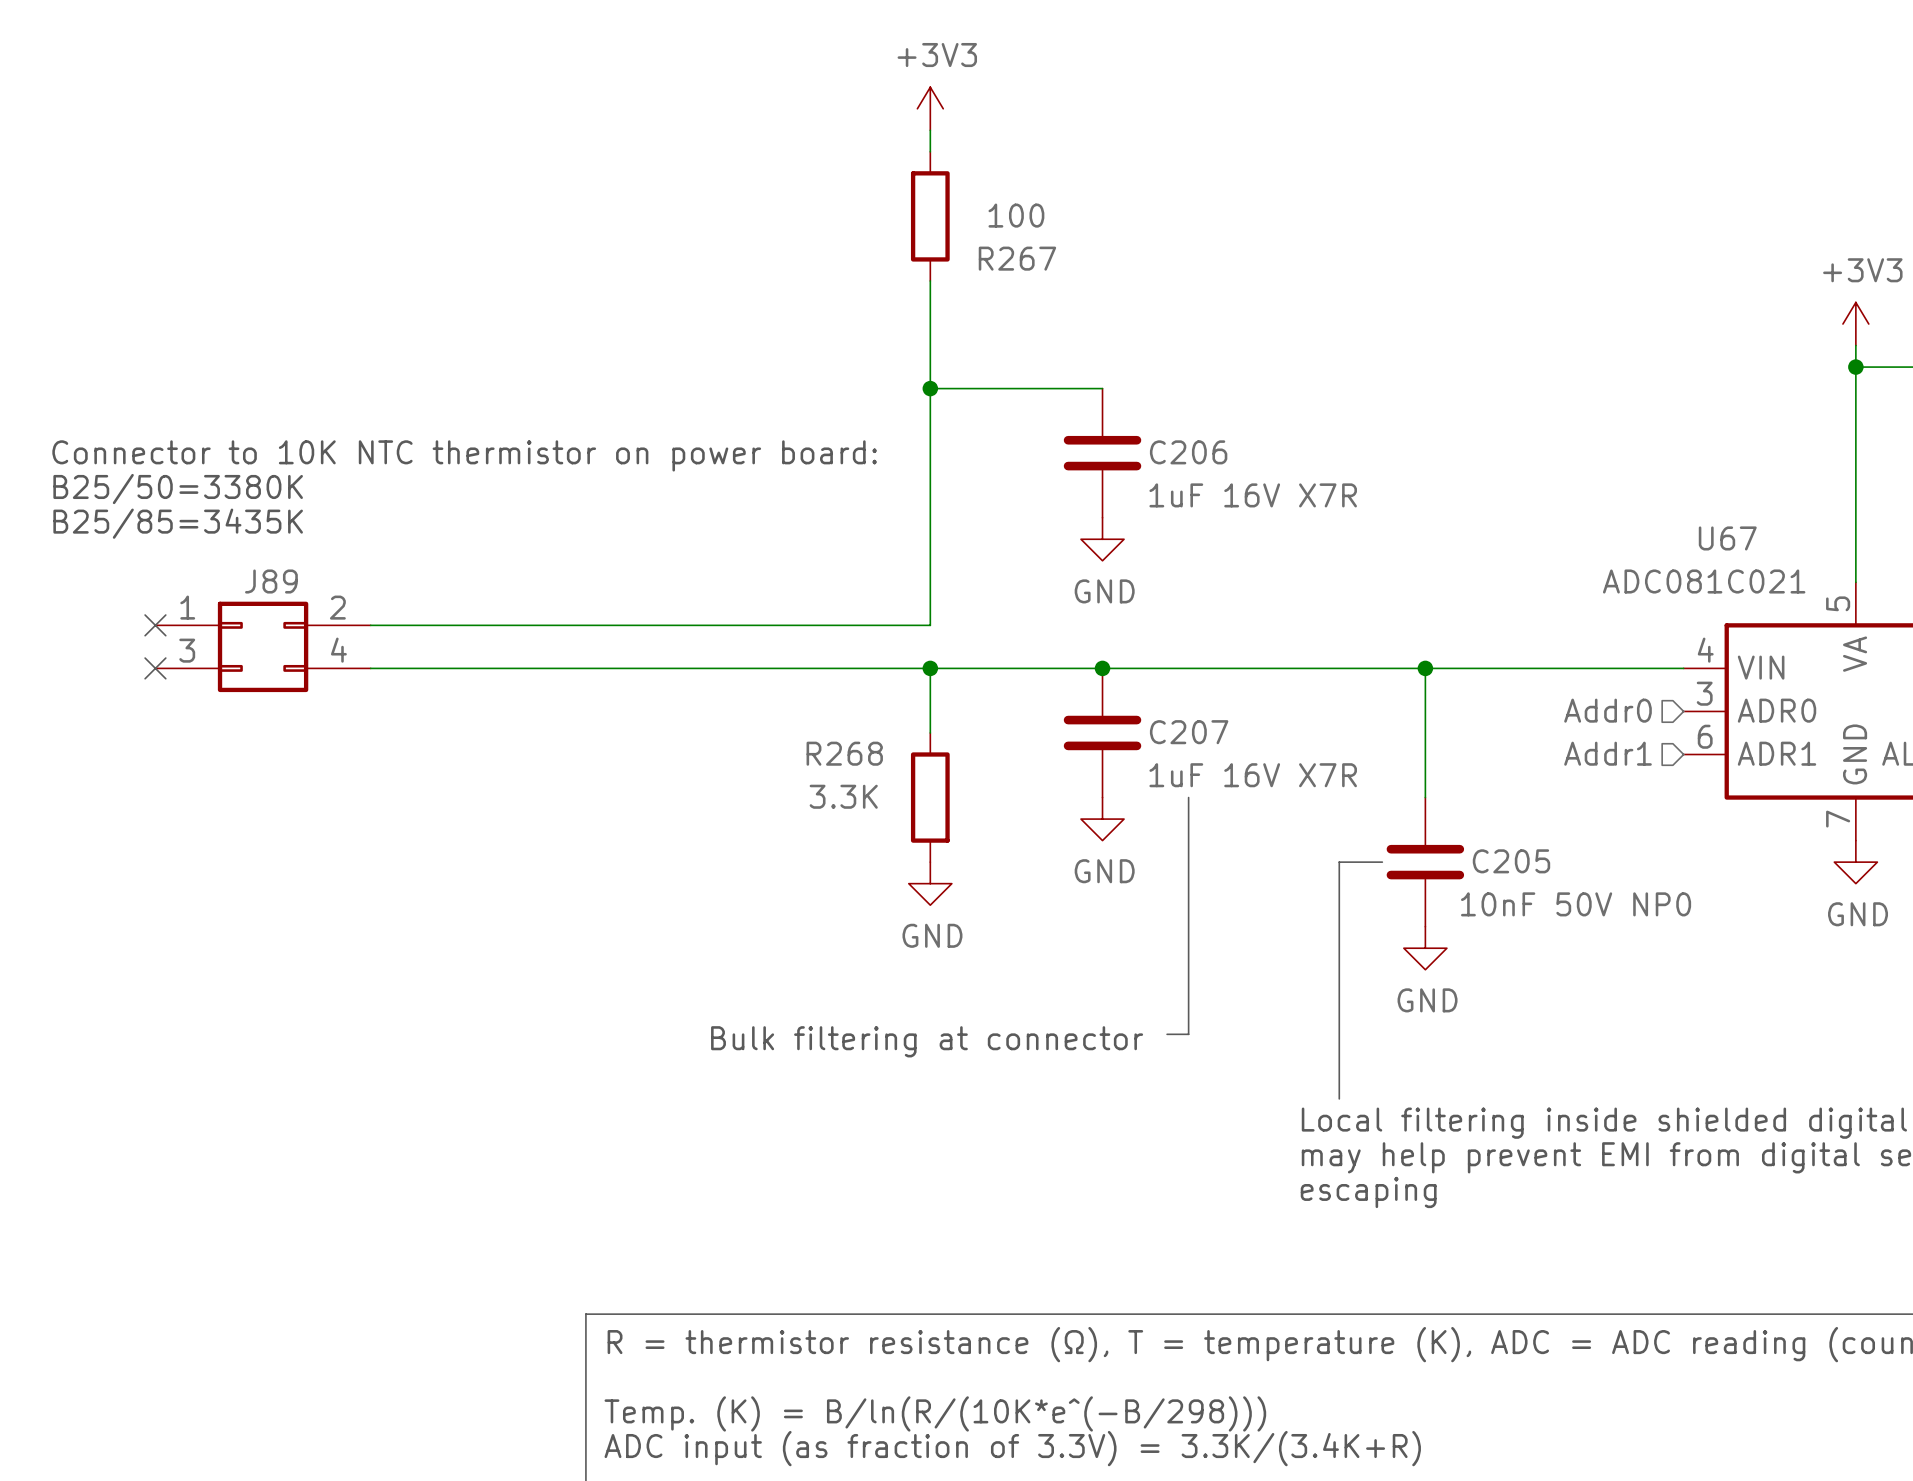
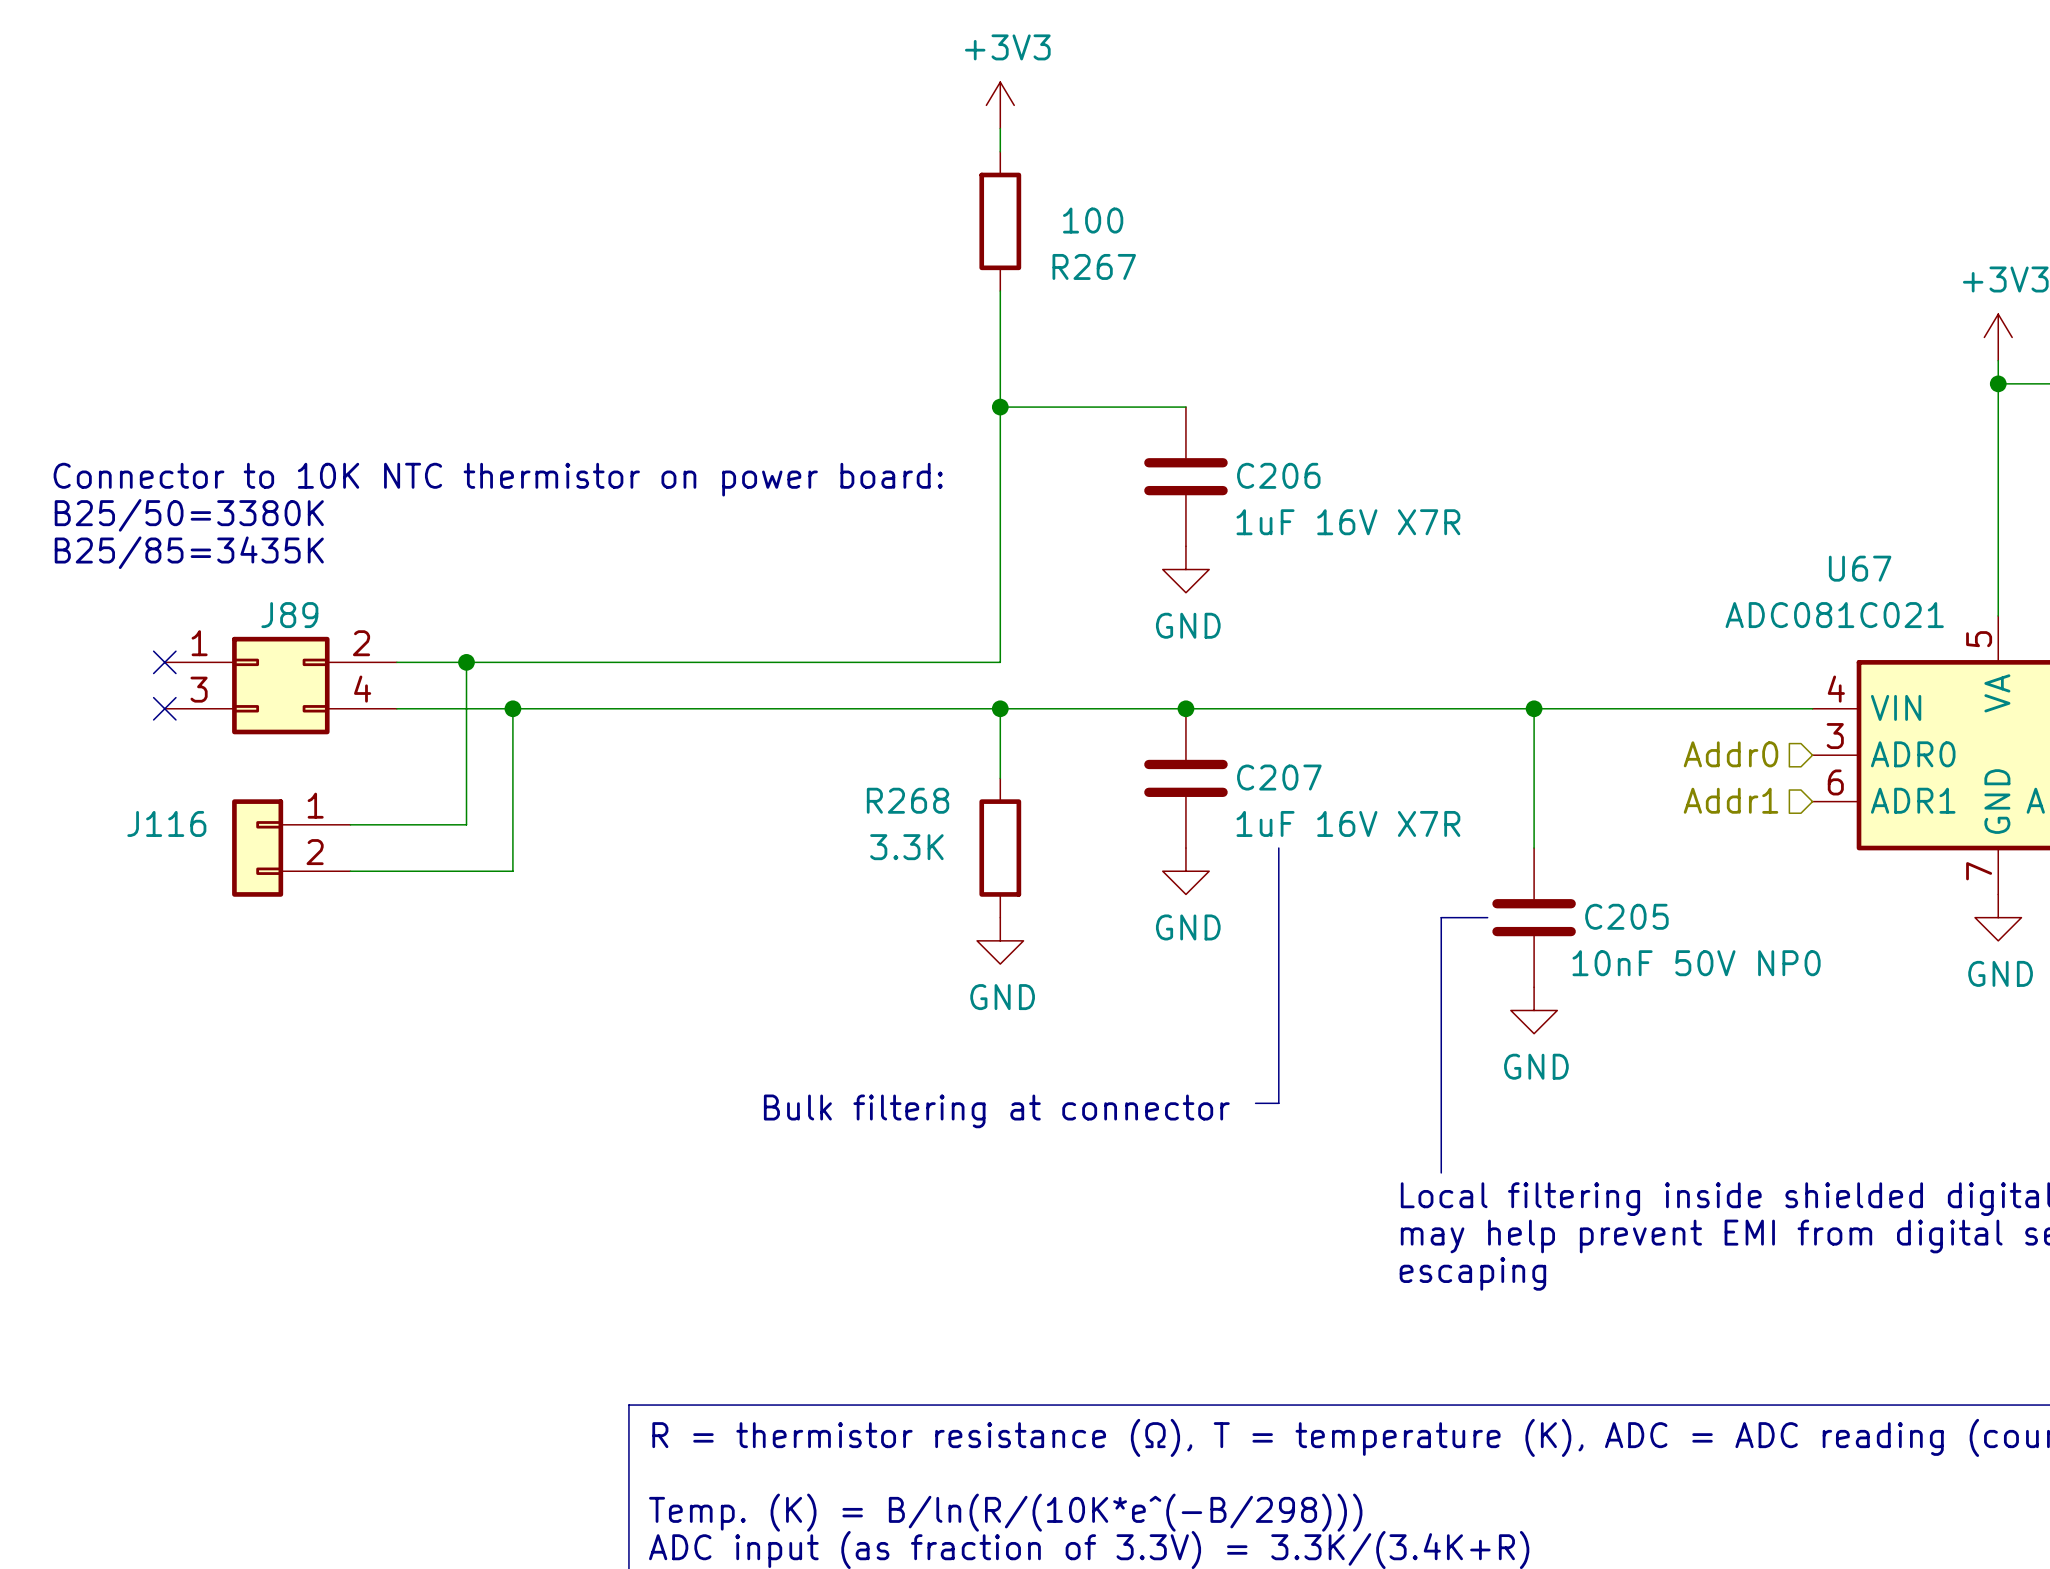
wire: none -> (466, 662) (466, 824) (350, 824)
junction: none -> (466, 662)
wire: none -> (512, 708) (512, 871) (350, 871)
junction: none -> (512, 708)
J116: none -> (291, 848)

